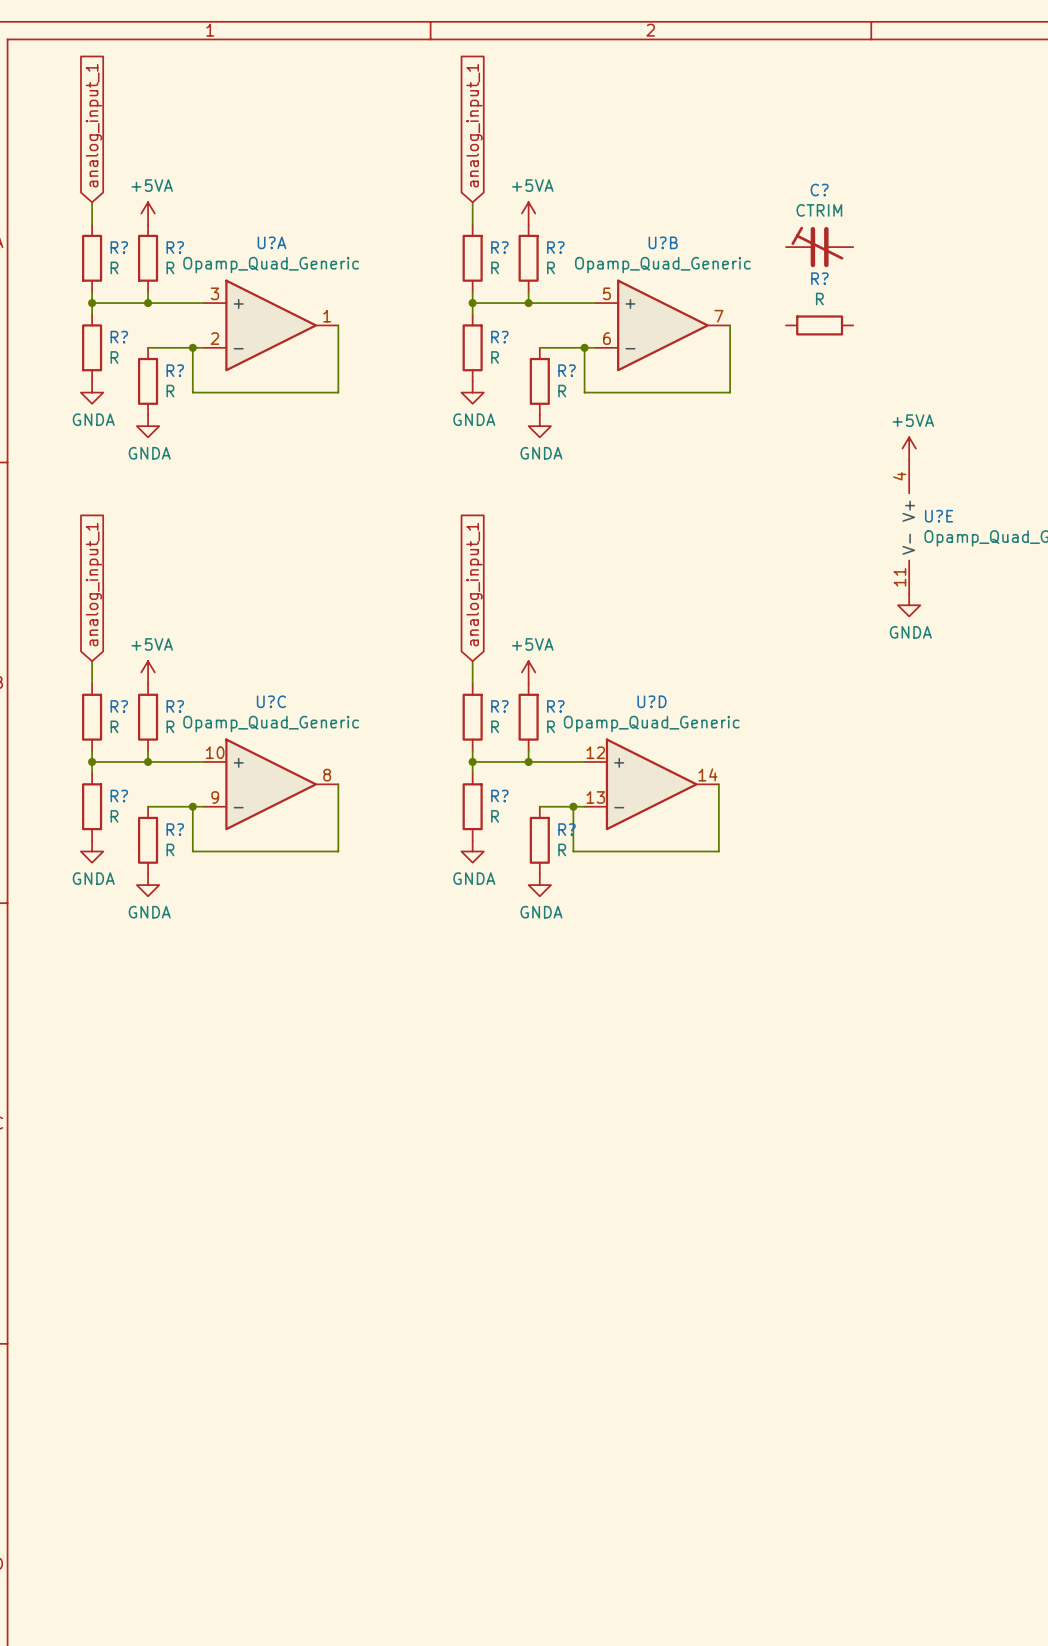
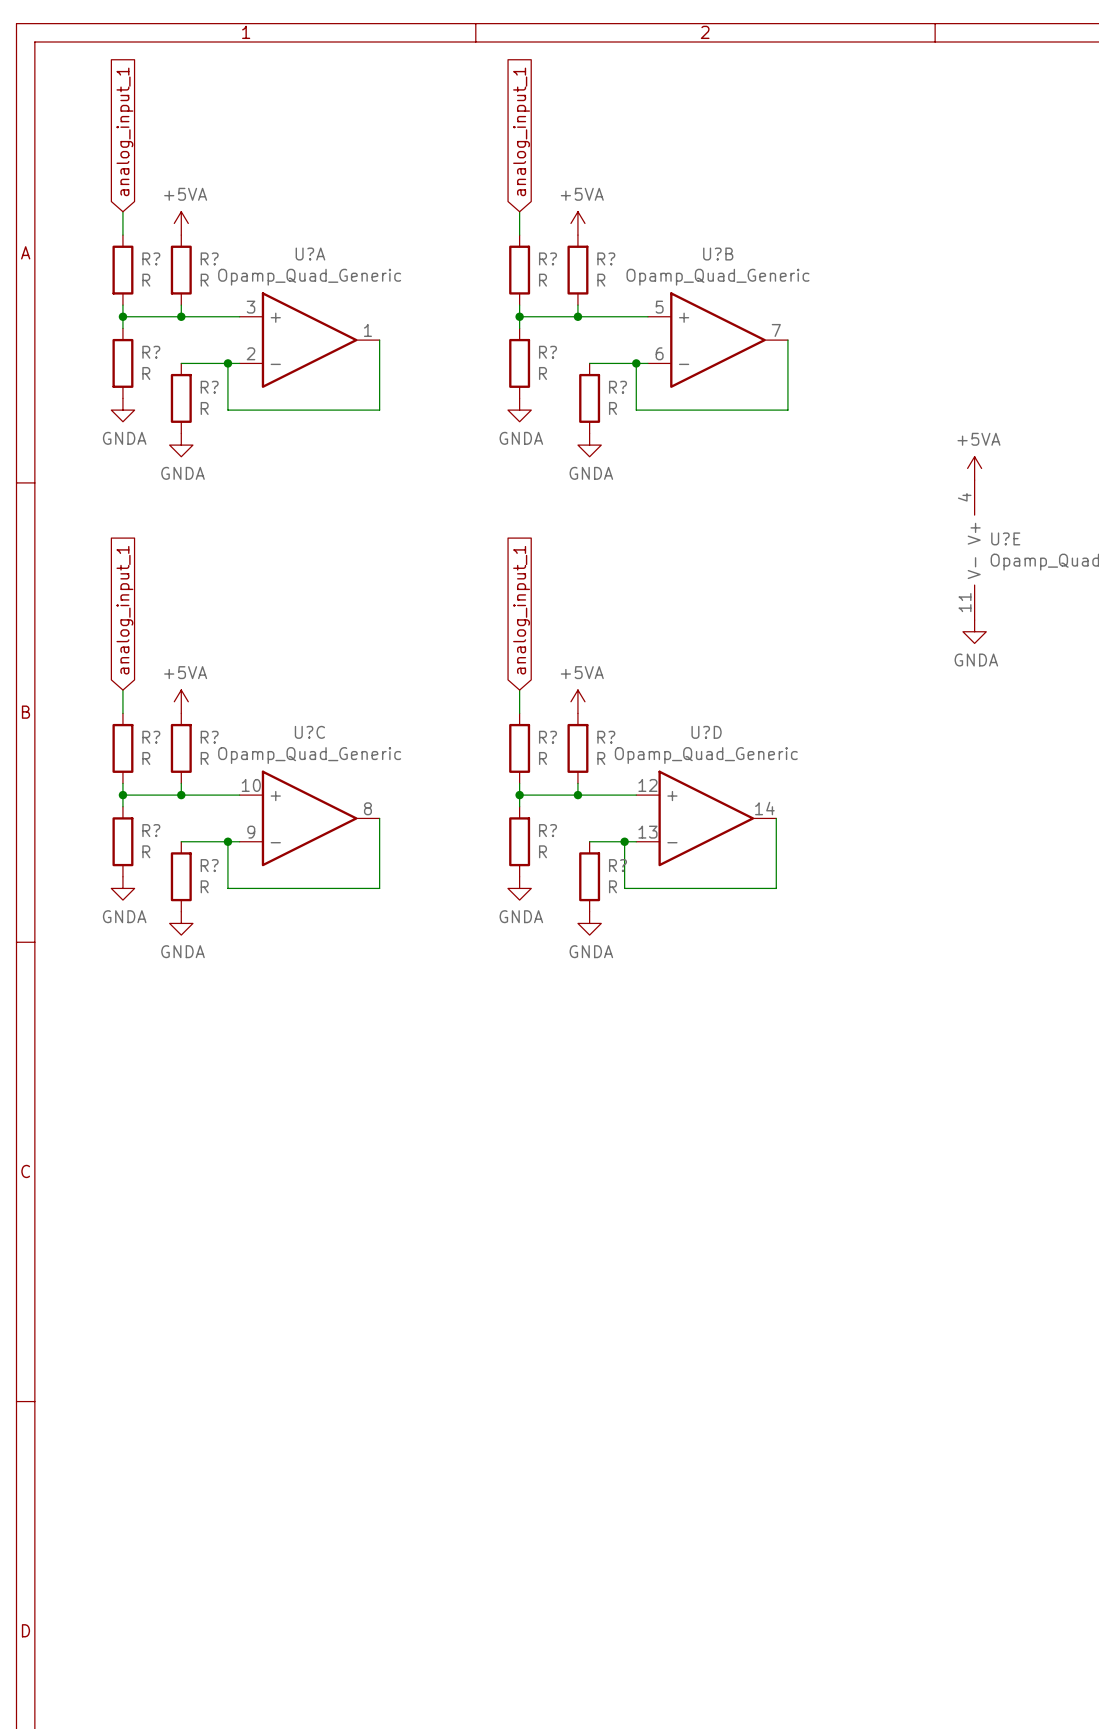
C?: CTRIM (819, 246) -> none
R?: R (819, 325) -> none

